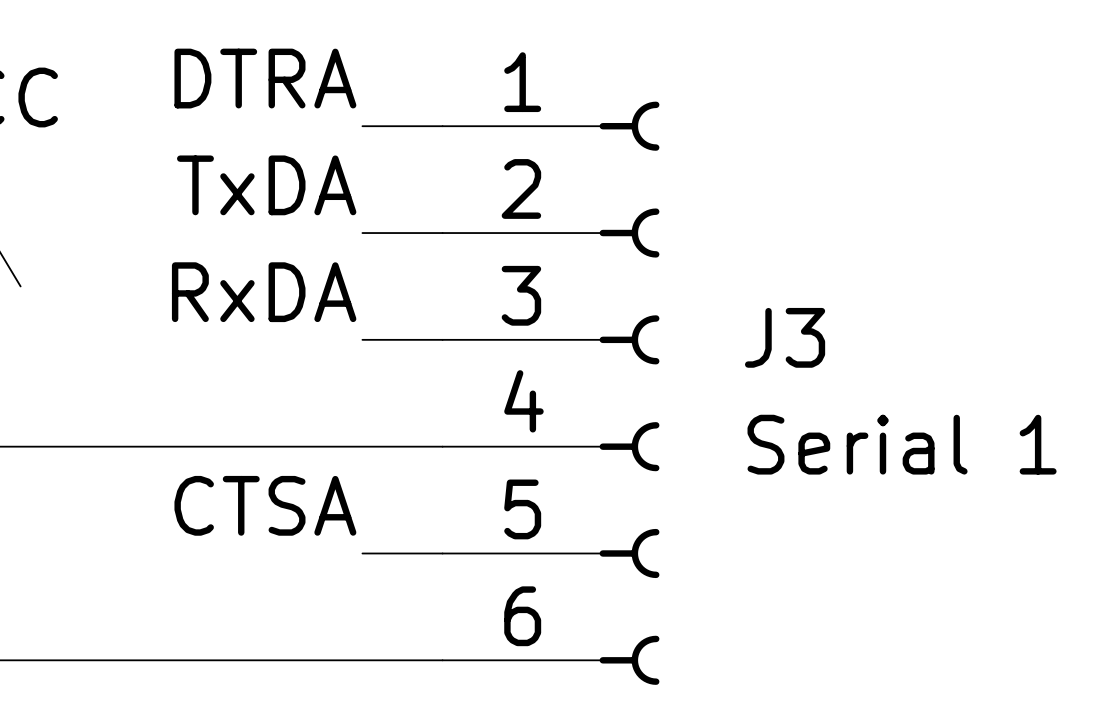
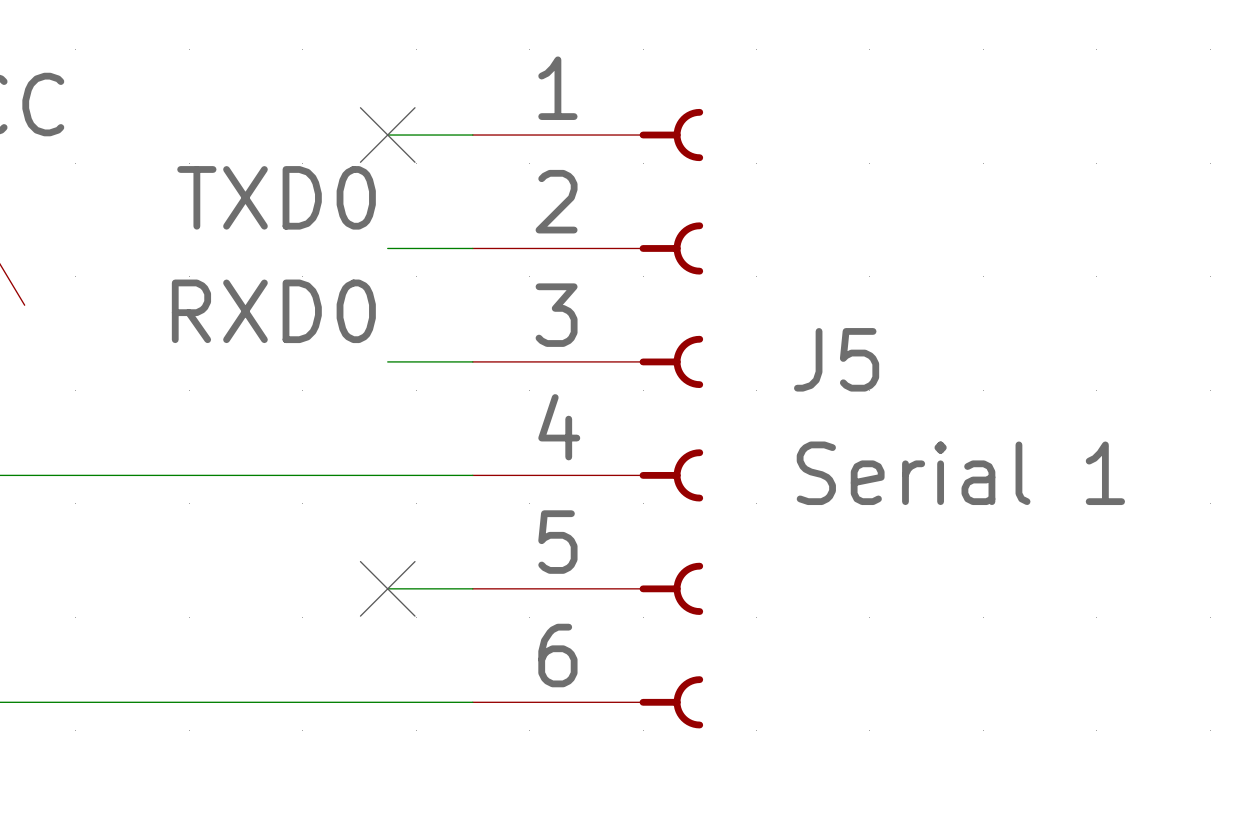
label: DTRA (265, 78) -> none
no-connect mark: none -> (387, 135)
label: TxDA (266, 185) -> TXD0 (276, 197)
label: RxDA (264, 292) -> RXD0 (273, 311)
J3 name: J3 (785, 337) -> J5 (836, 359)
label: CTSA (265, 505) -> none
no-connect mark: none -> (387, 588)

